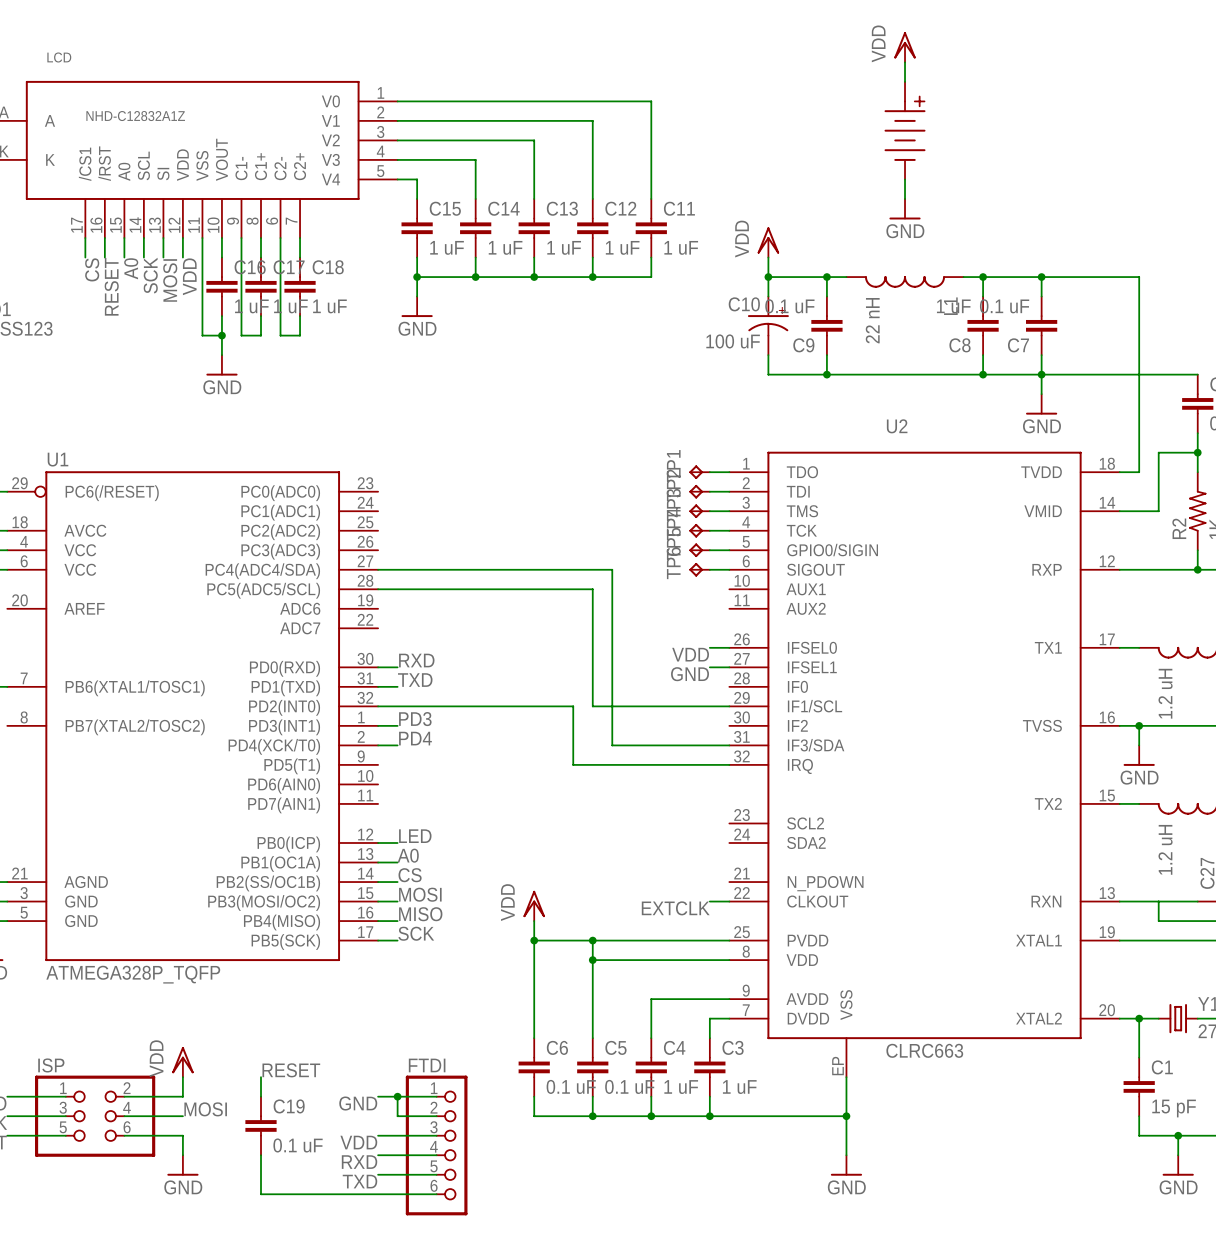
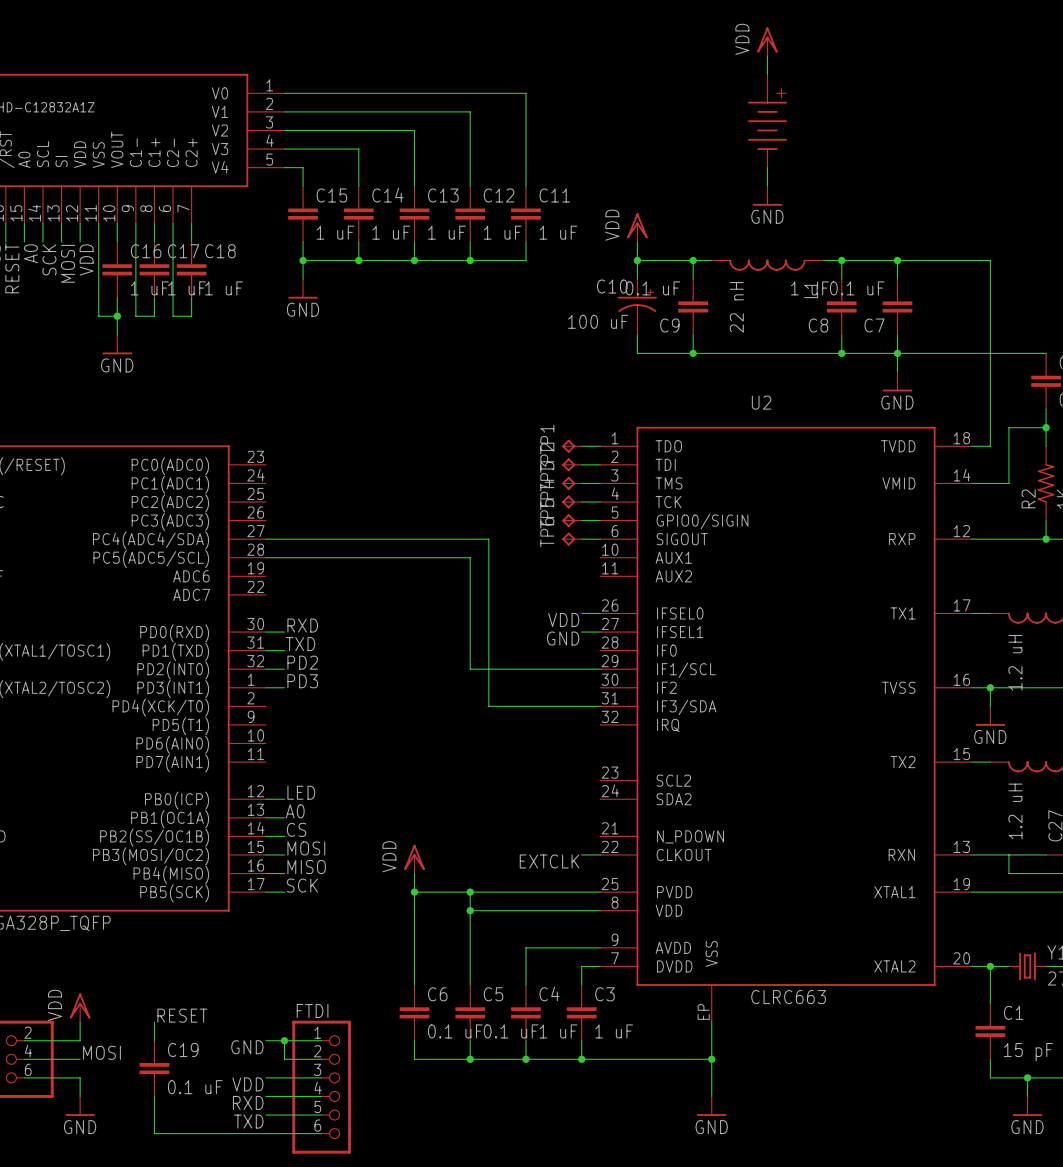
label: none -> PD2 (302, 662)
wire: (397, 706) (573, 706) (573, 764) (729, 764) -> none
label: PD4 (415, 738) -> none
wire: (378, 745) (397, 745) -> none

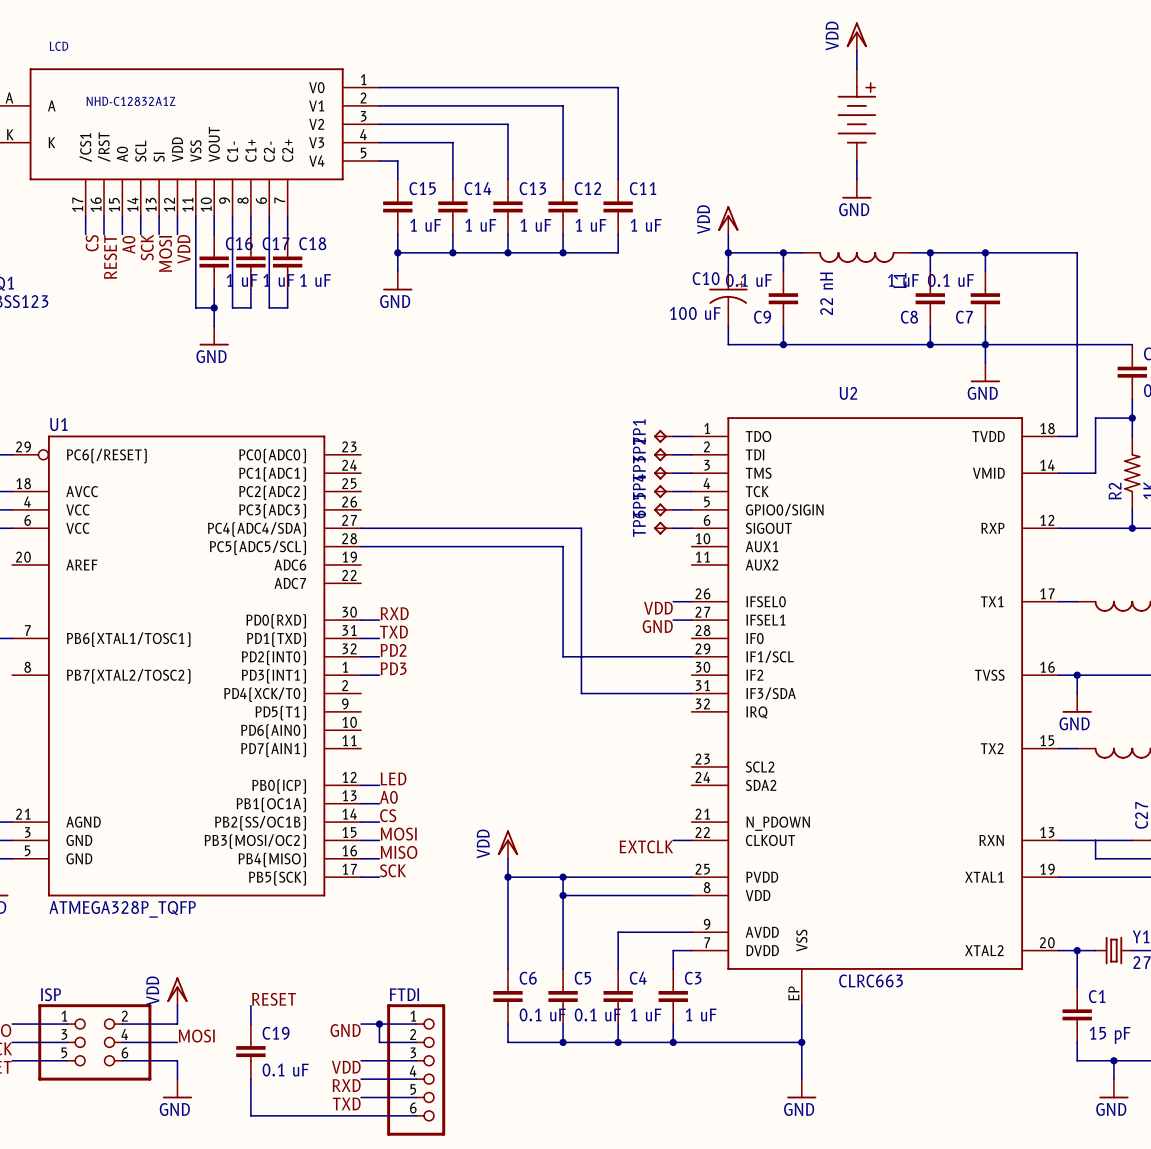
part value: 1.2 uH (1015, 662) -> none
part value: 1.2 uH (1015, 811) -> none

